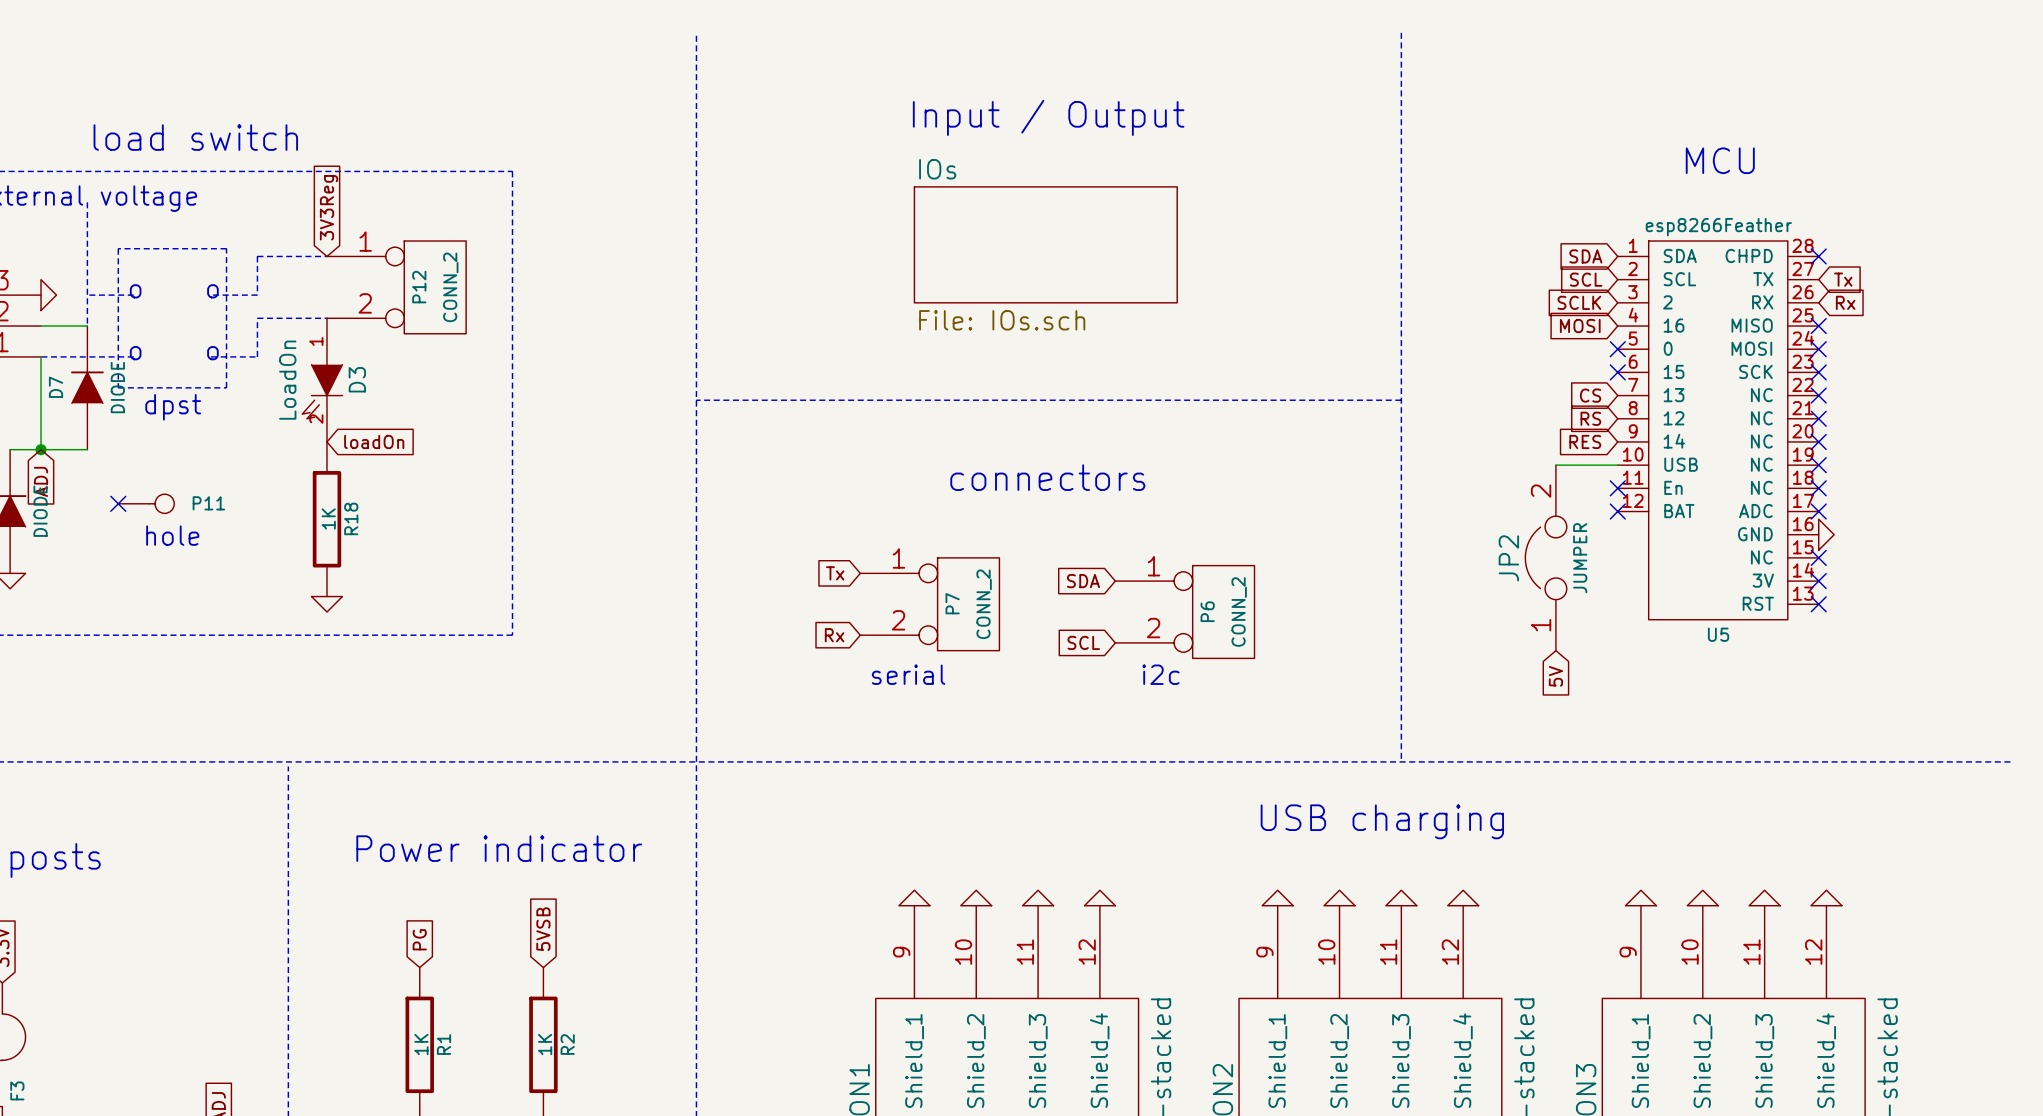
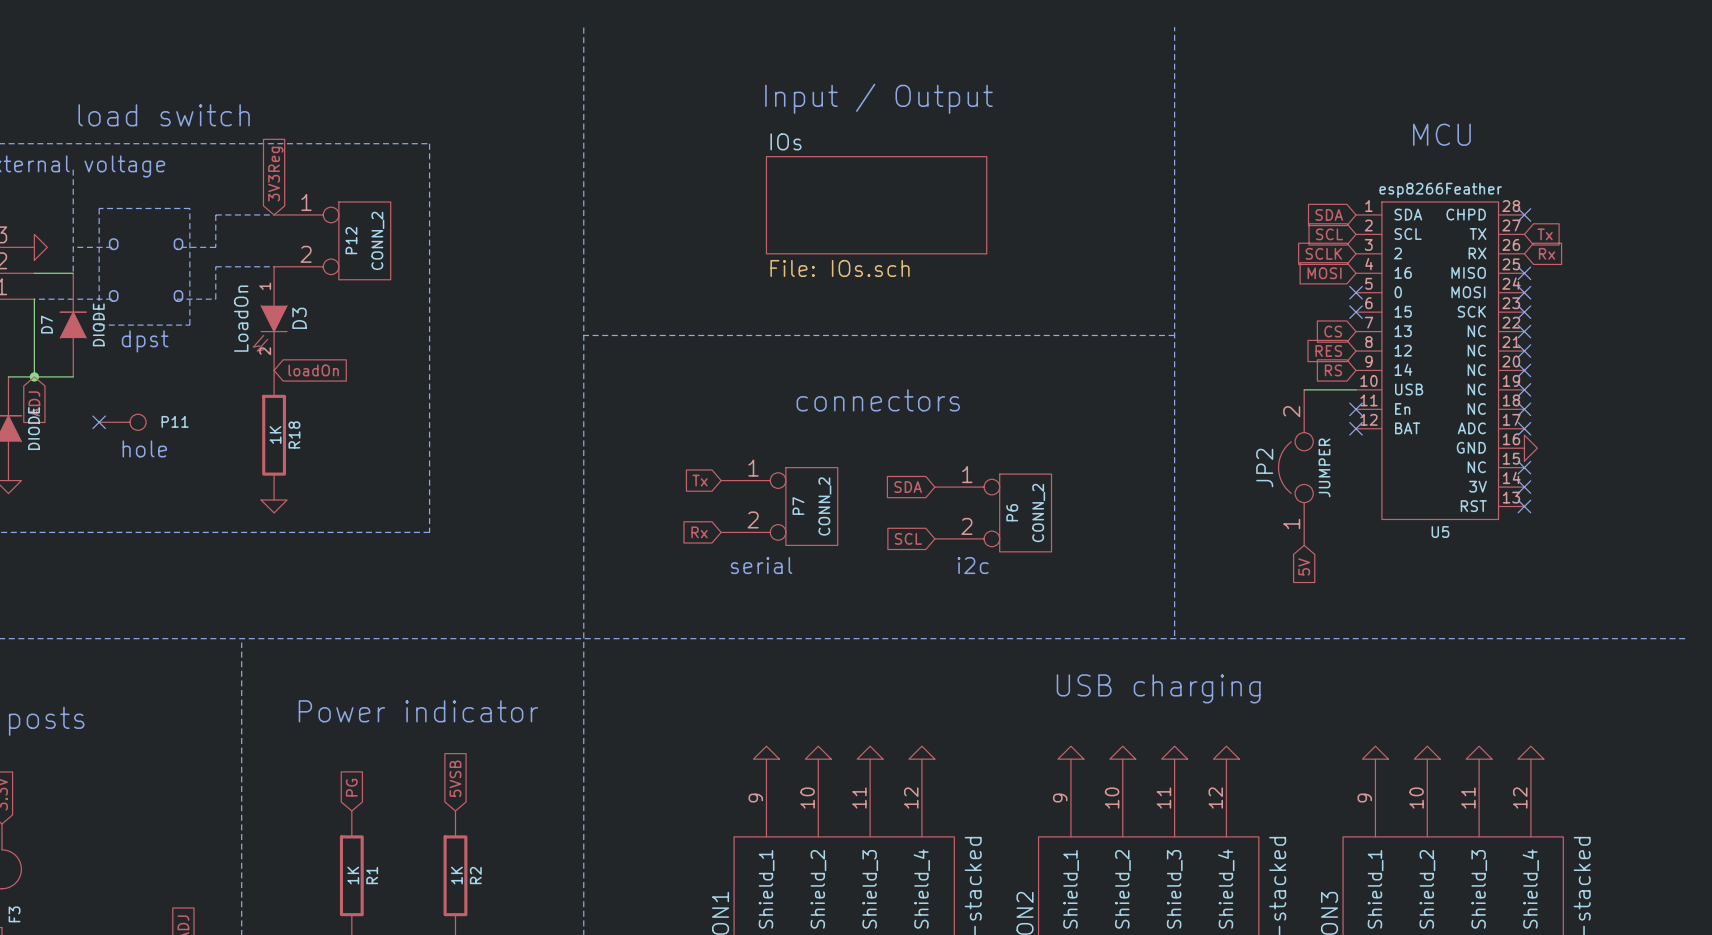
global label: RS (1590, 418) -> RES (1328, 351)
global label: RES (1585, 441) -> RS (1333, 370)

